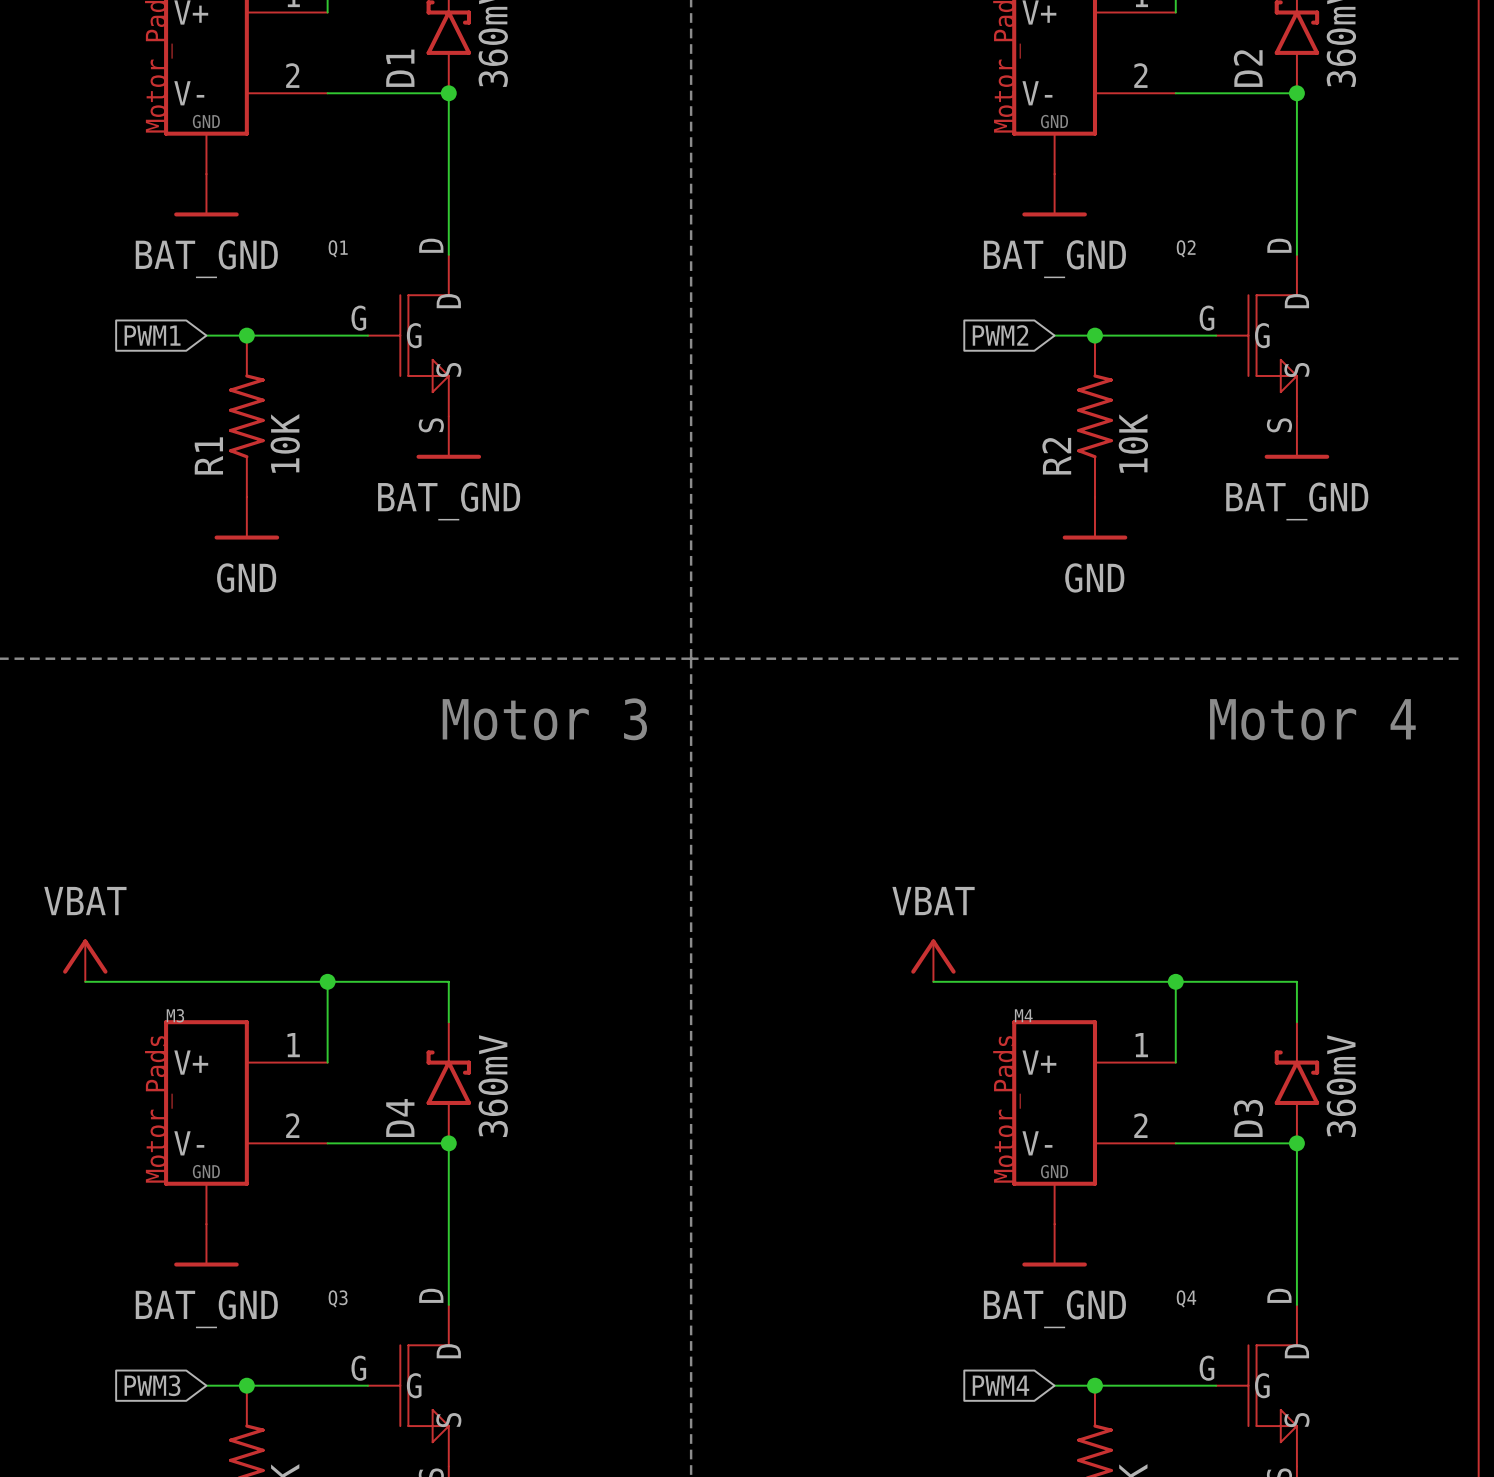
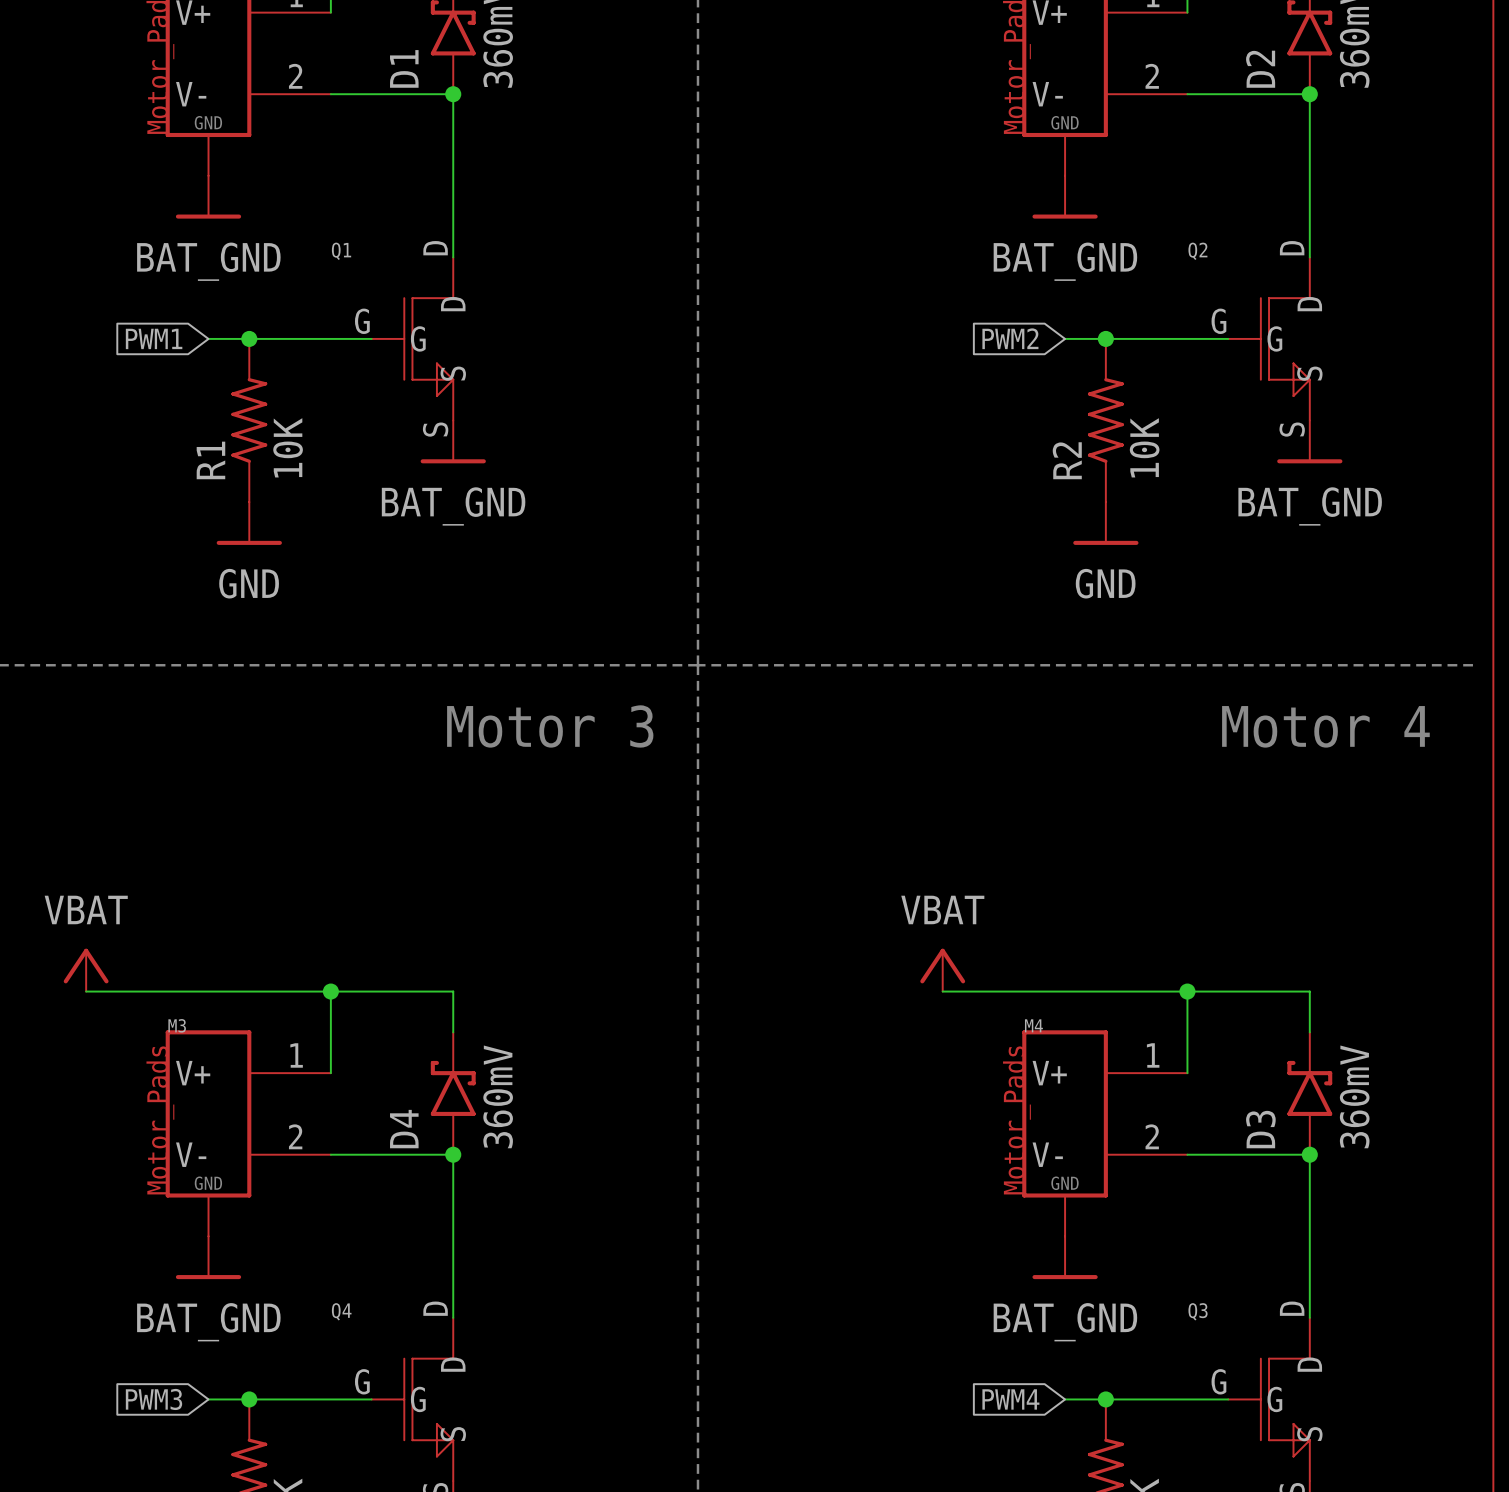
Q3 name: Q3 (338, 1298) -> Q4 (341, 1311)
Q4 name: Q4 (1186, 1298) -> Q3 (1198, 1311)

